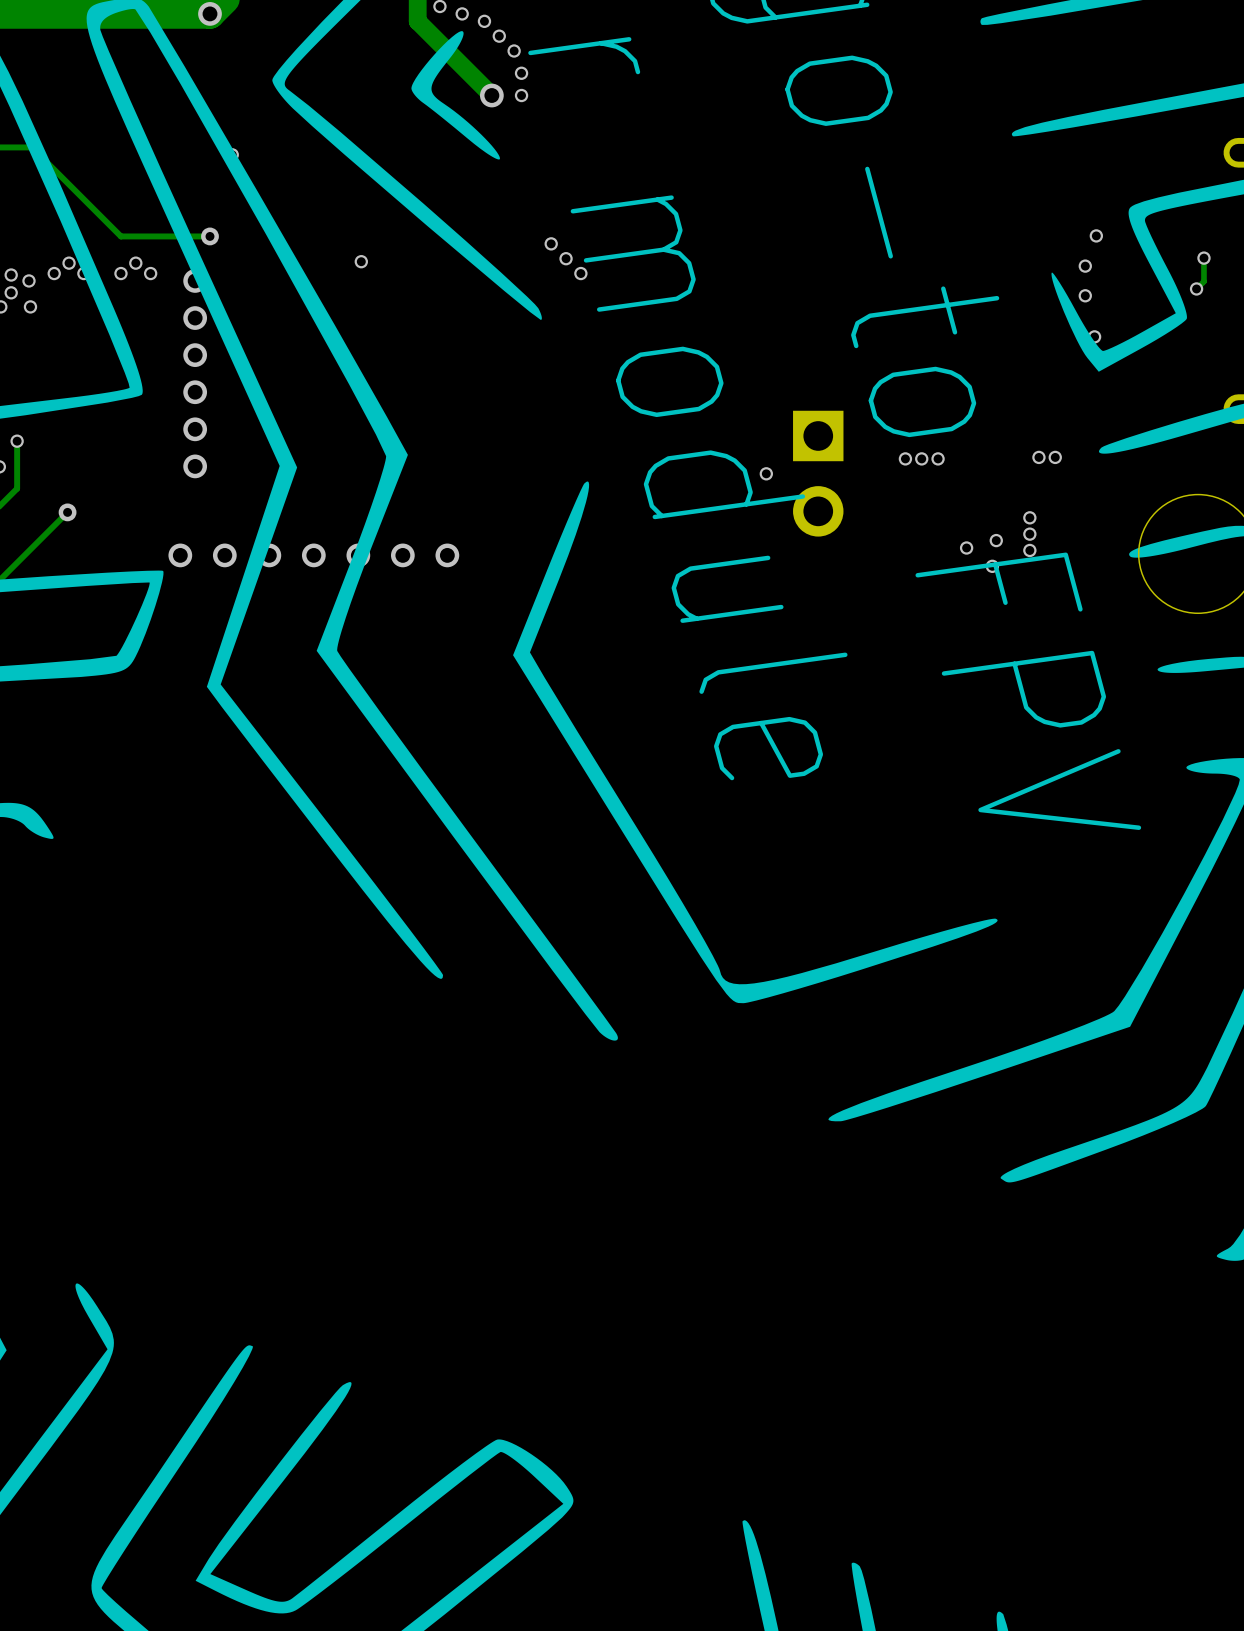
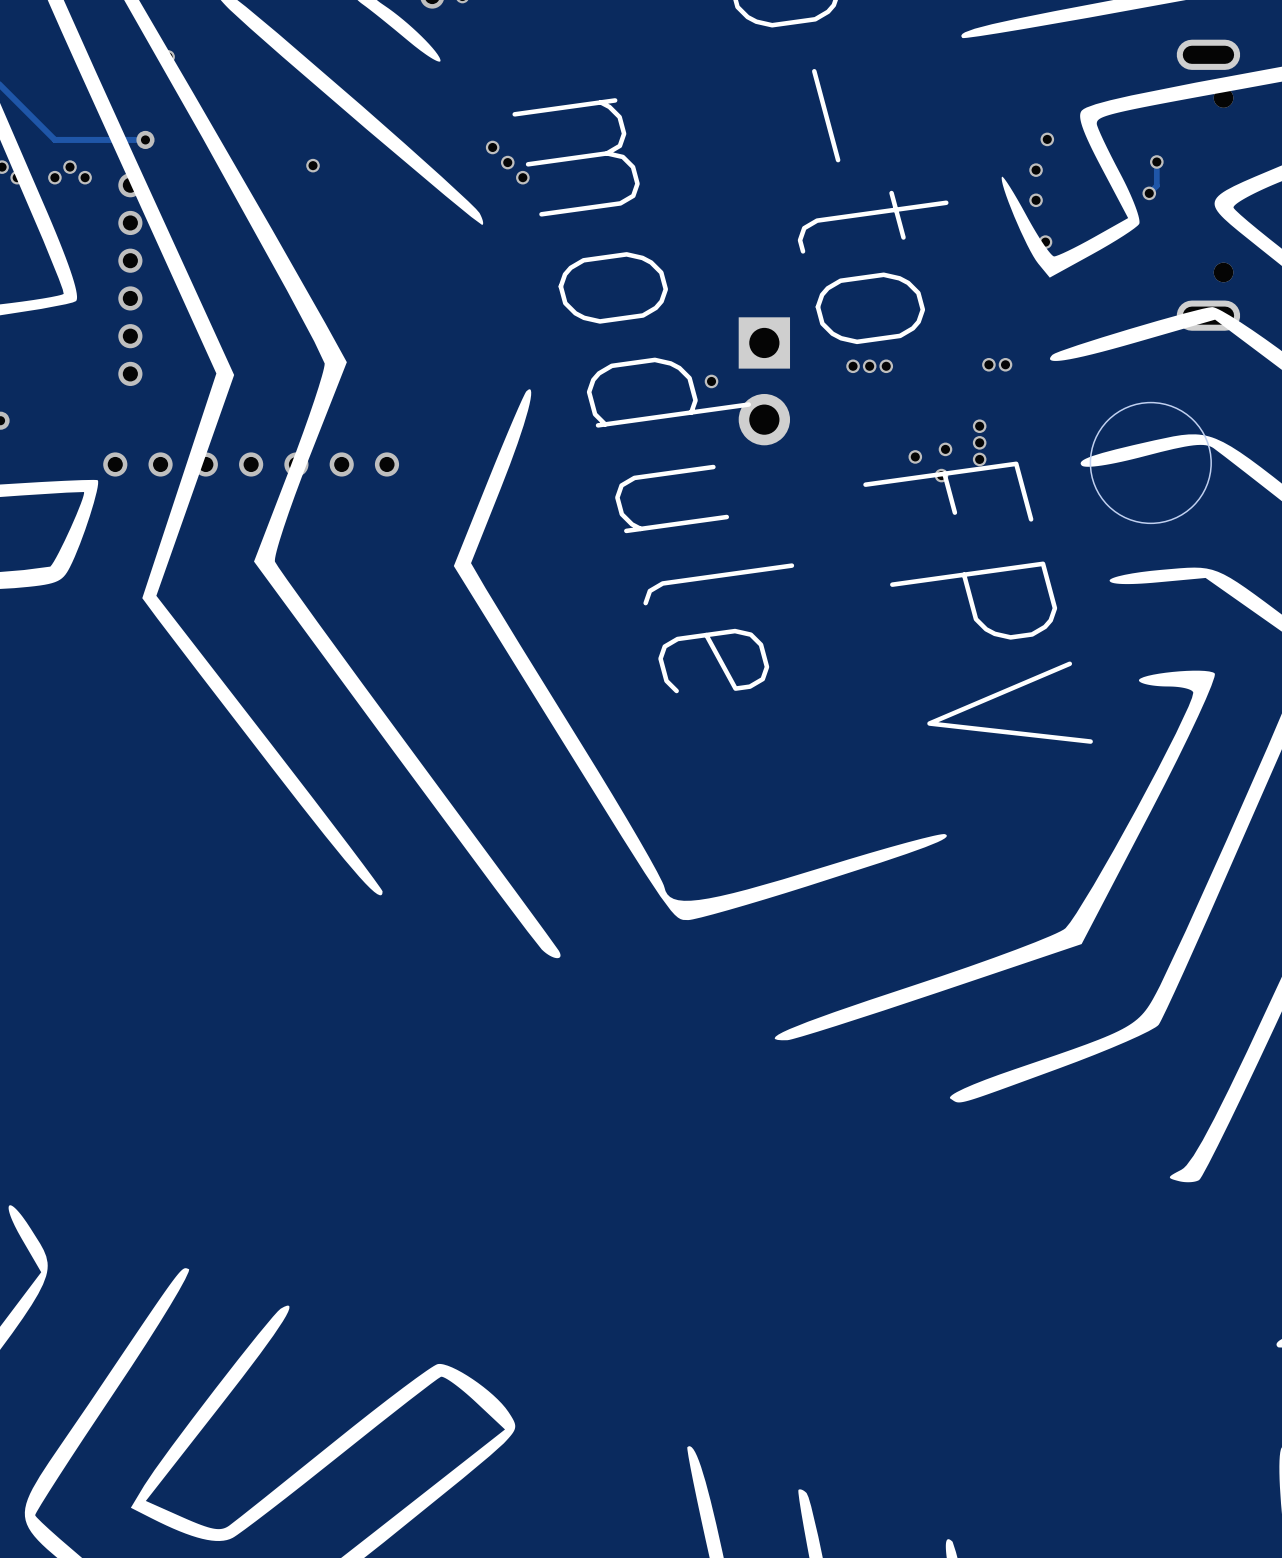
via position: (361, 261) -> (313, 165)

